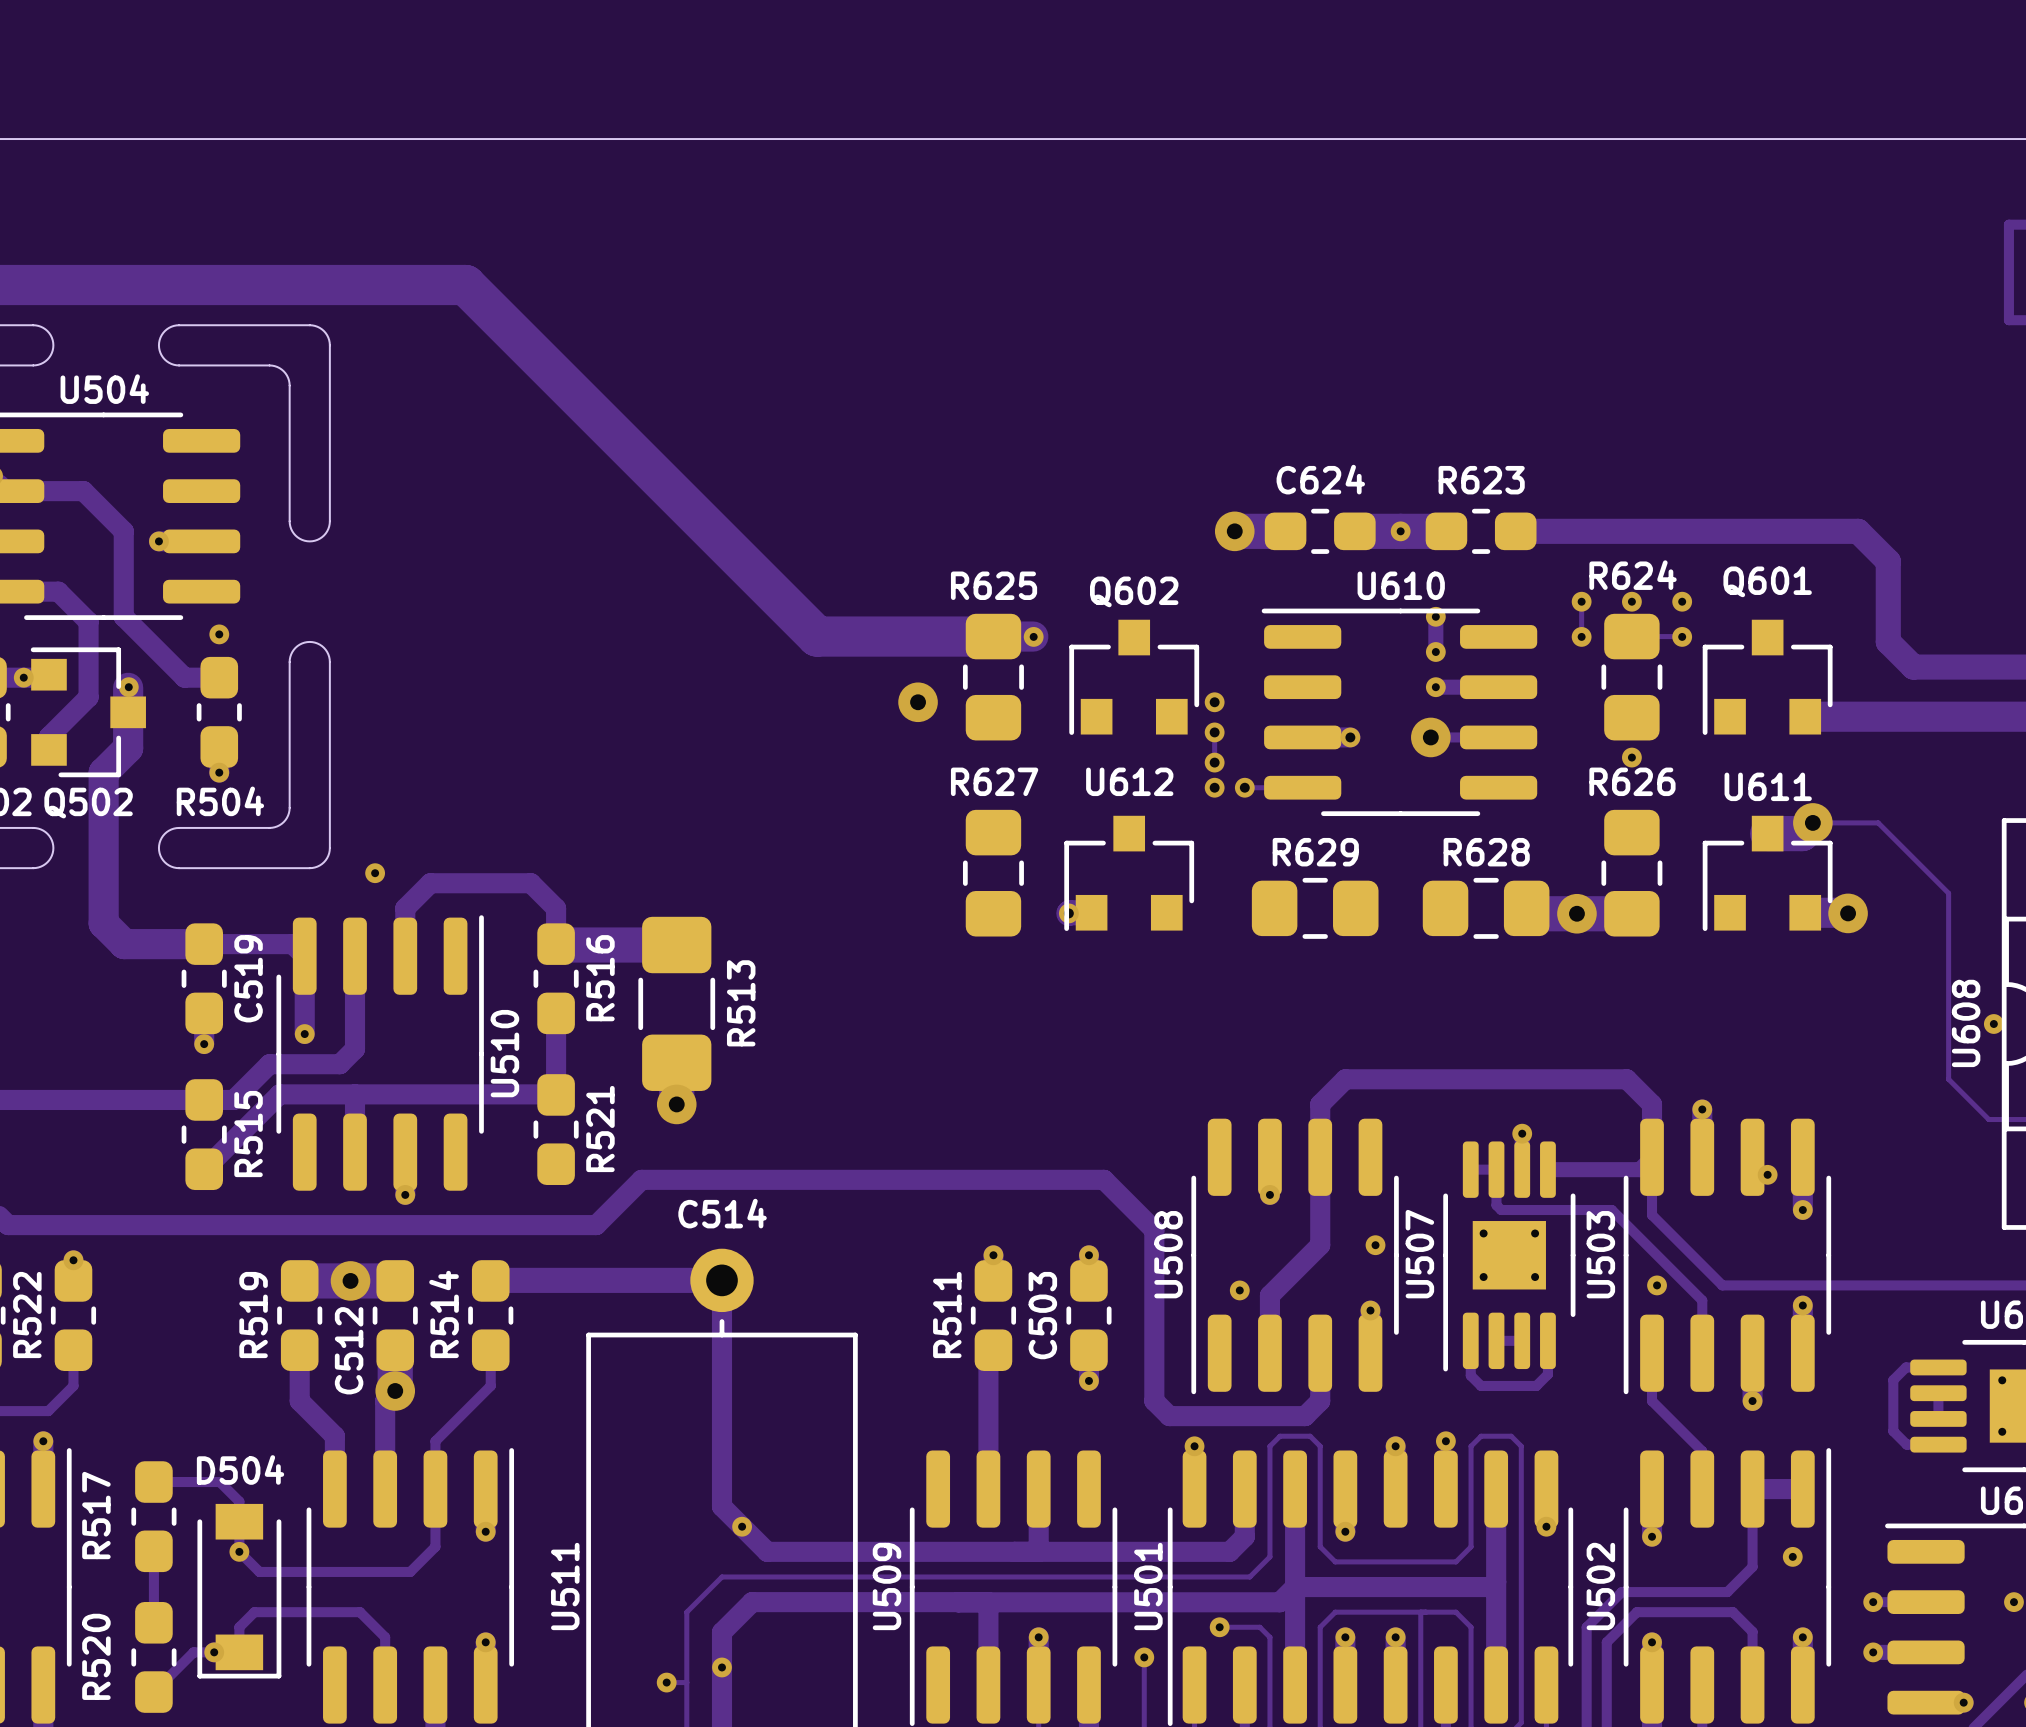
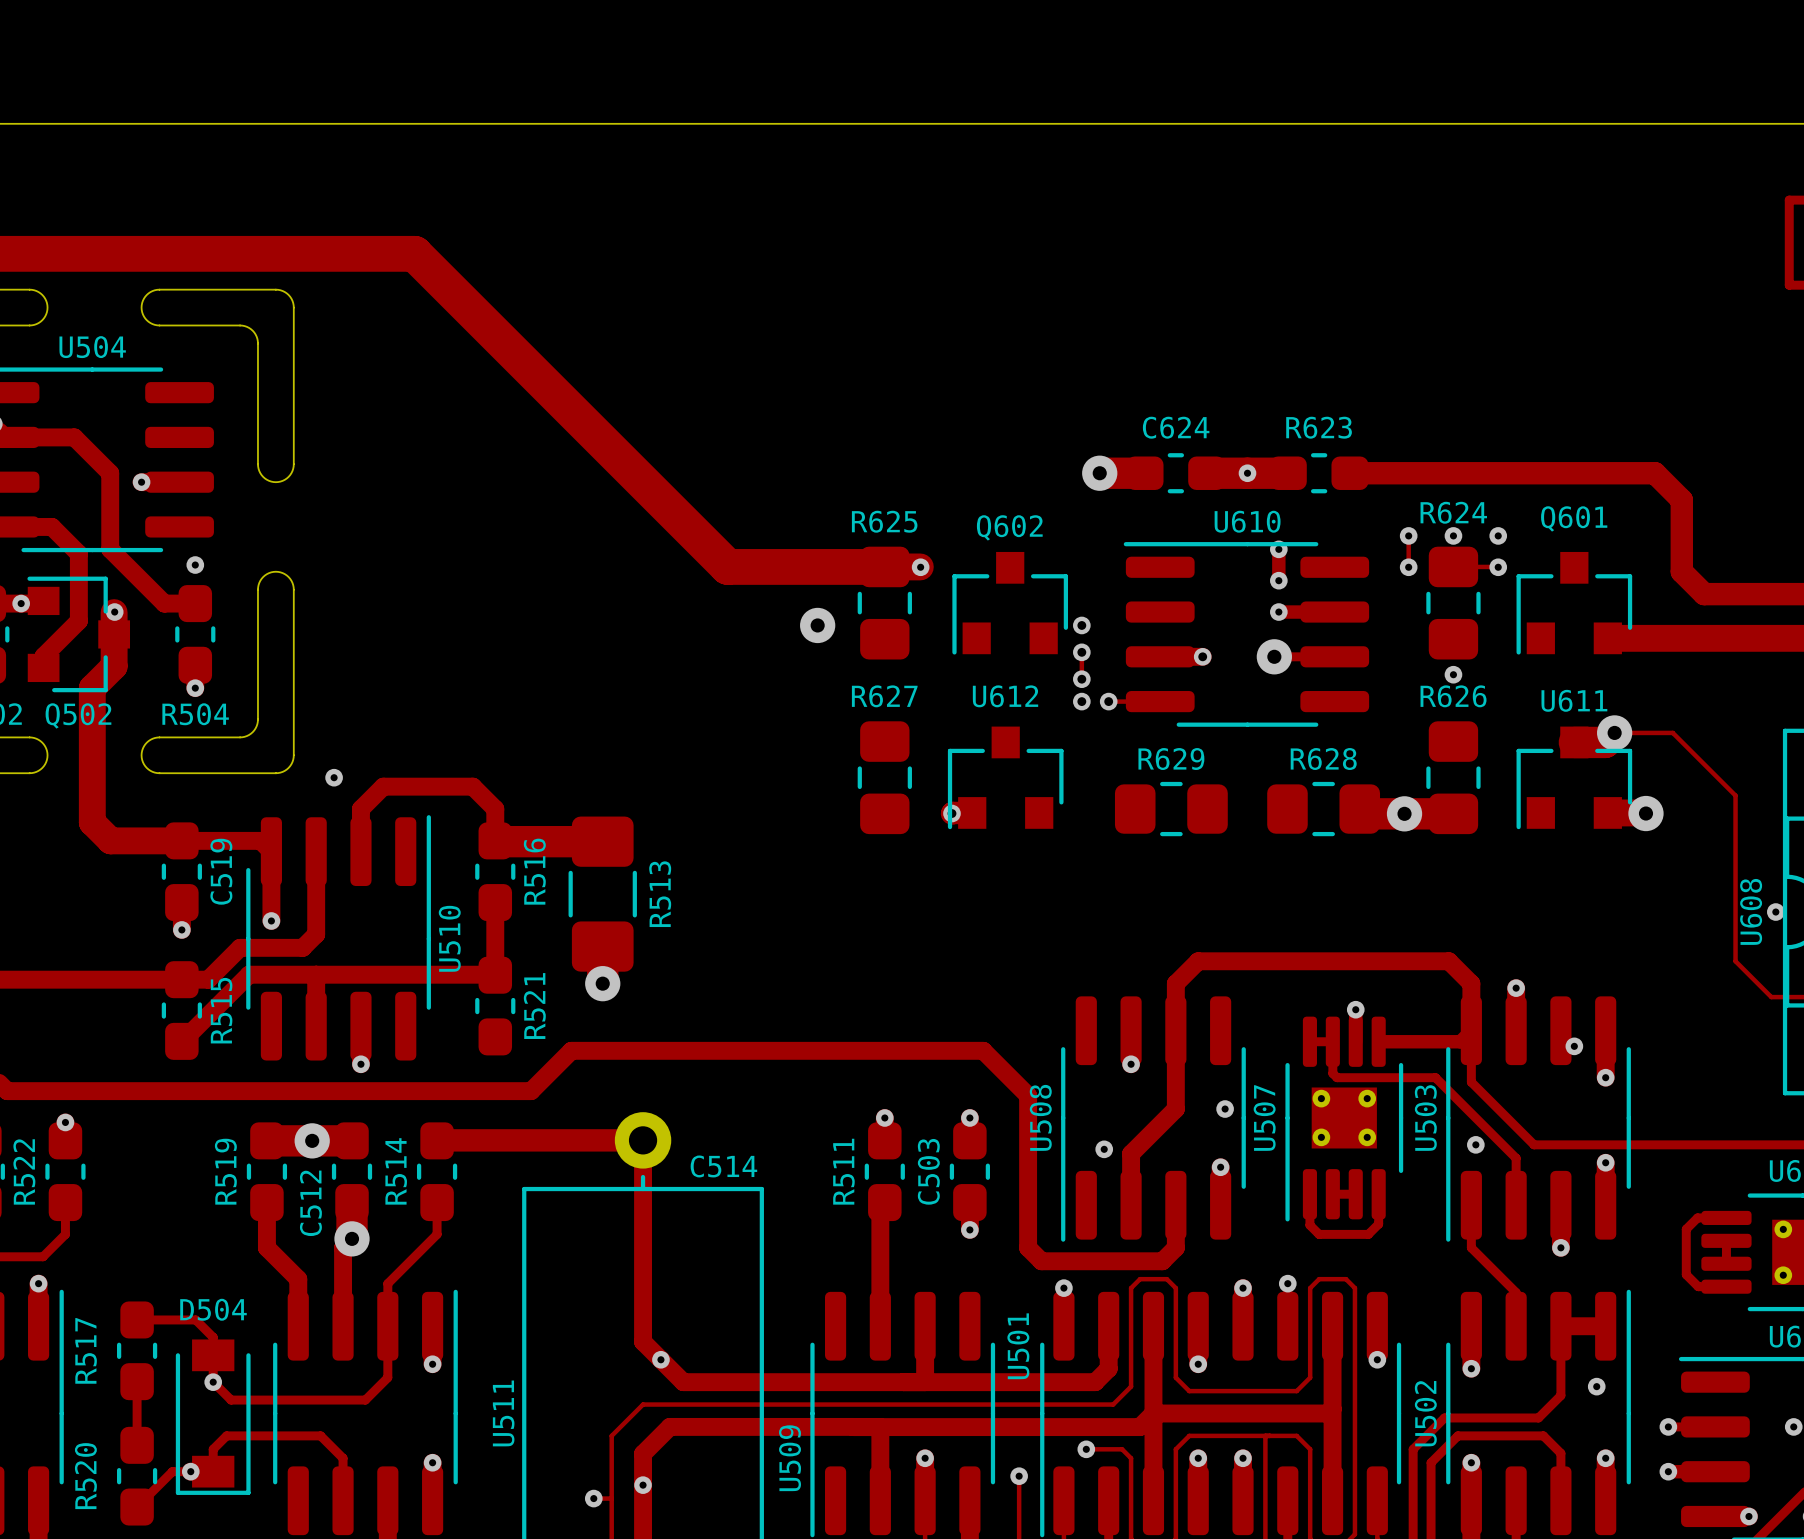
C514 name position: C514 (722, 1213) -> C514 (723, 1166)
U509 name position: U509 (887, 1586) -> U509 (790, 1458)
U501 name position: U501 (1148, 1586) -> U501 (1018, 1346)

